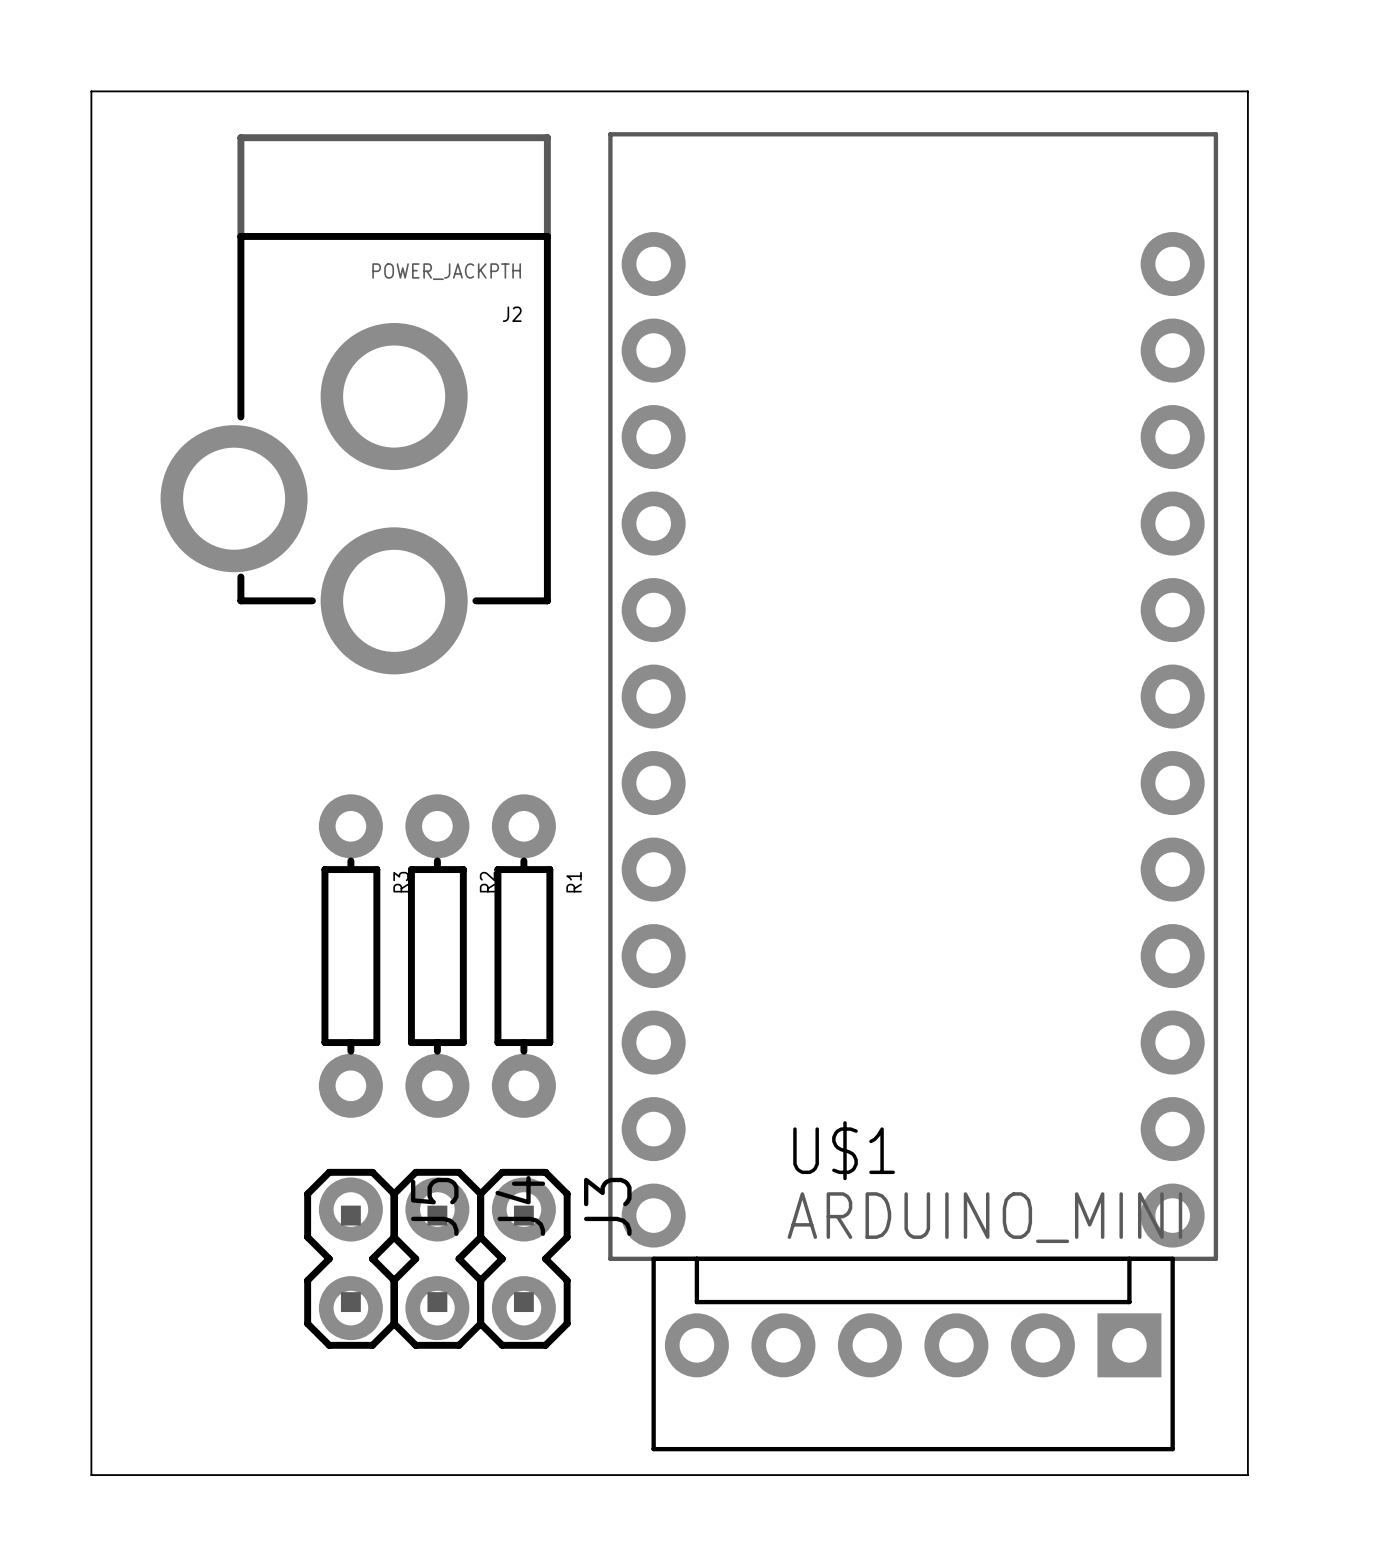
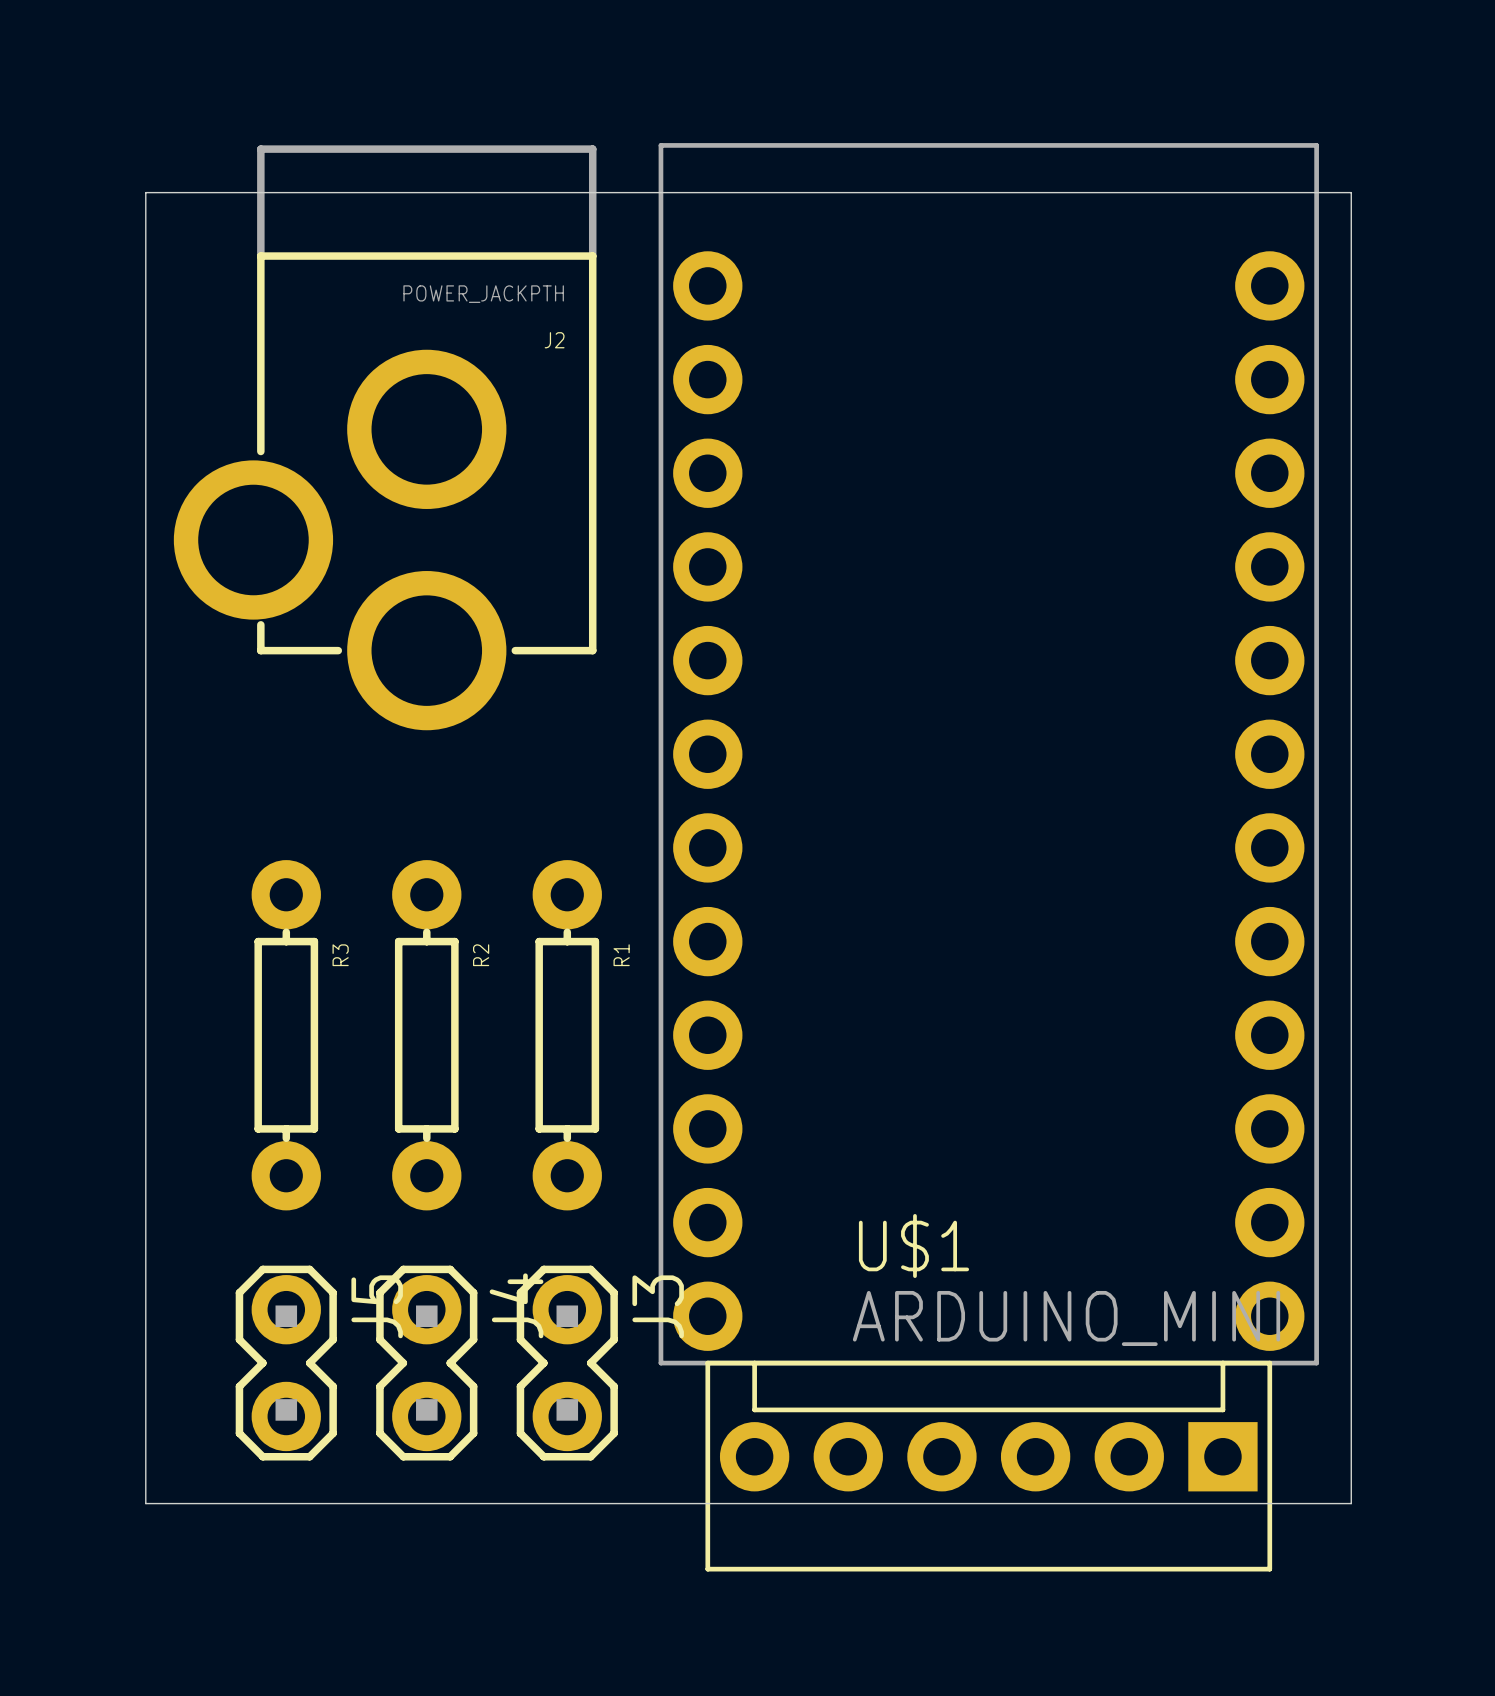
board edge: (1247, 177) (1247, 91) (91, 91) (91, 1475) (1247, 1475) (1247, 1388) -> (1351, 192) (145, 192) (145, 1503) (1351, 1503)
R3 position: (350, 956) -> (286, 1035)
R2 position: (437, 956) -> (426, 1035)
J5 position: (350, 1258) -> (286, 1363)
J4 position: (437, 1258) -> (426, 1363)

